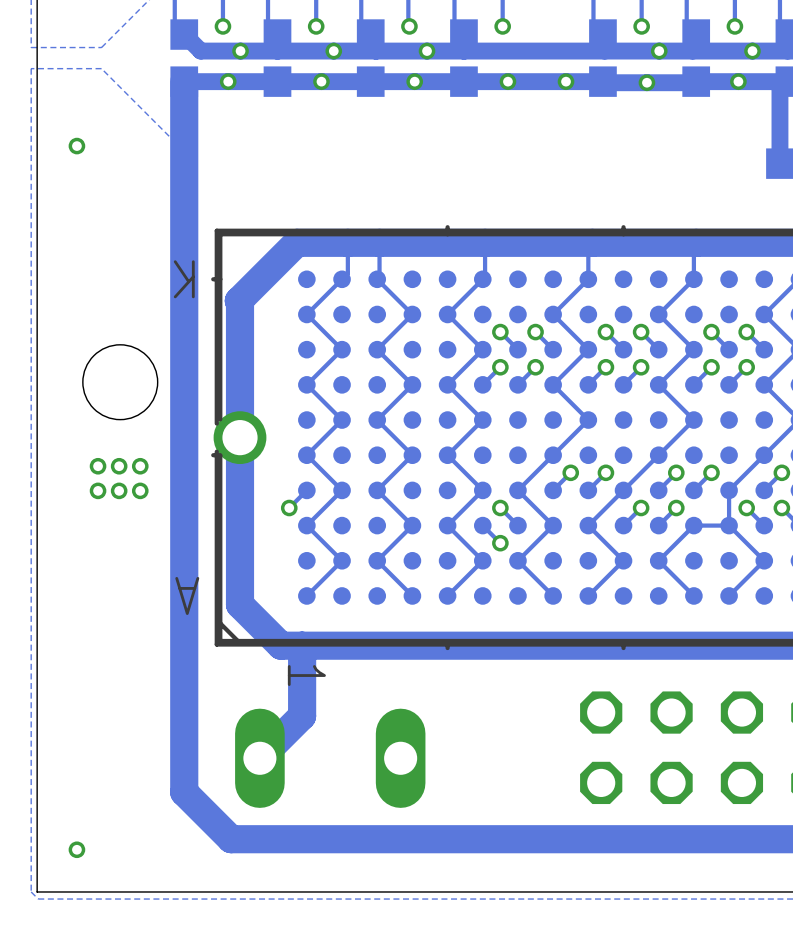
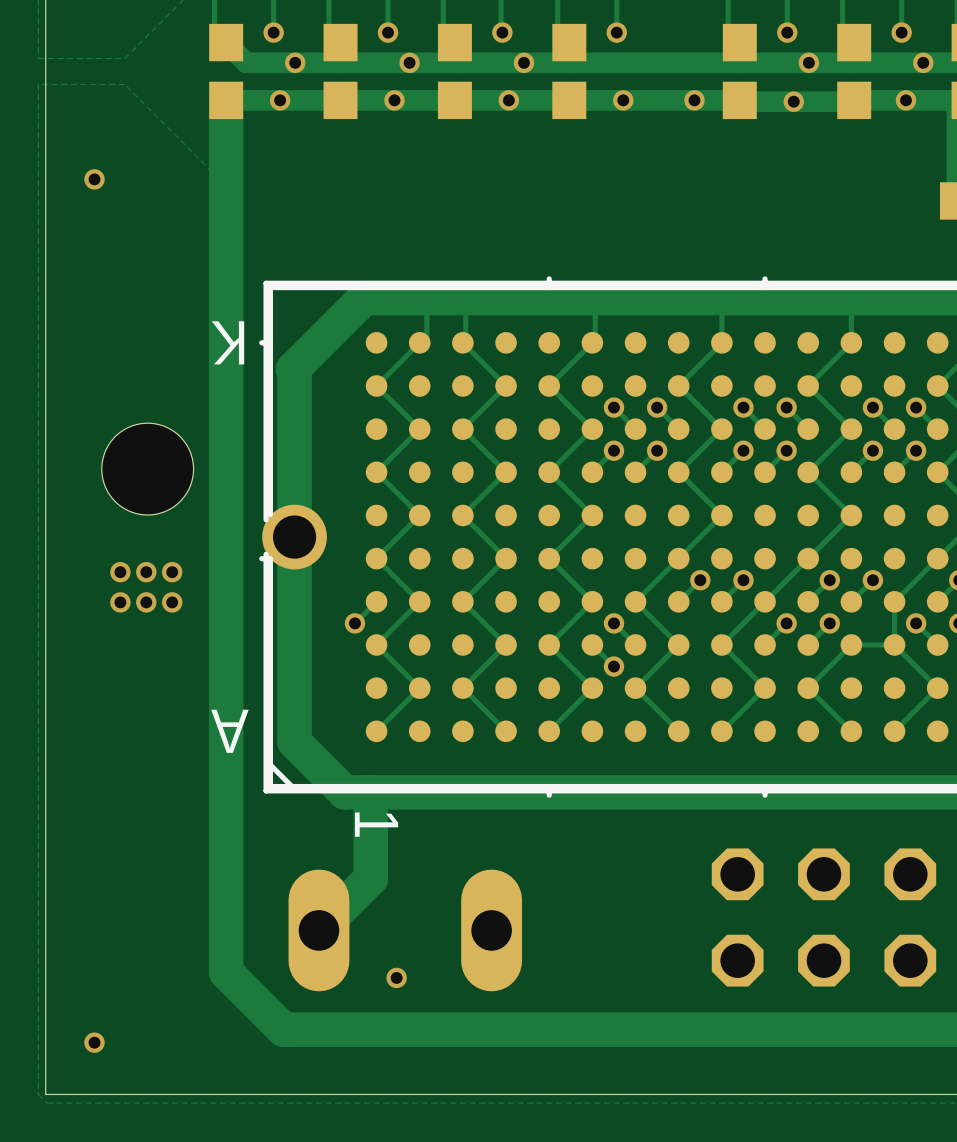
via: none -> (396, 977)

